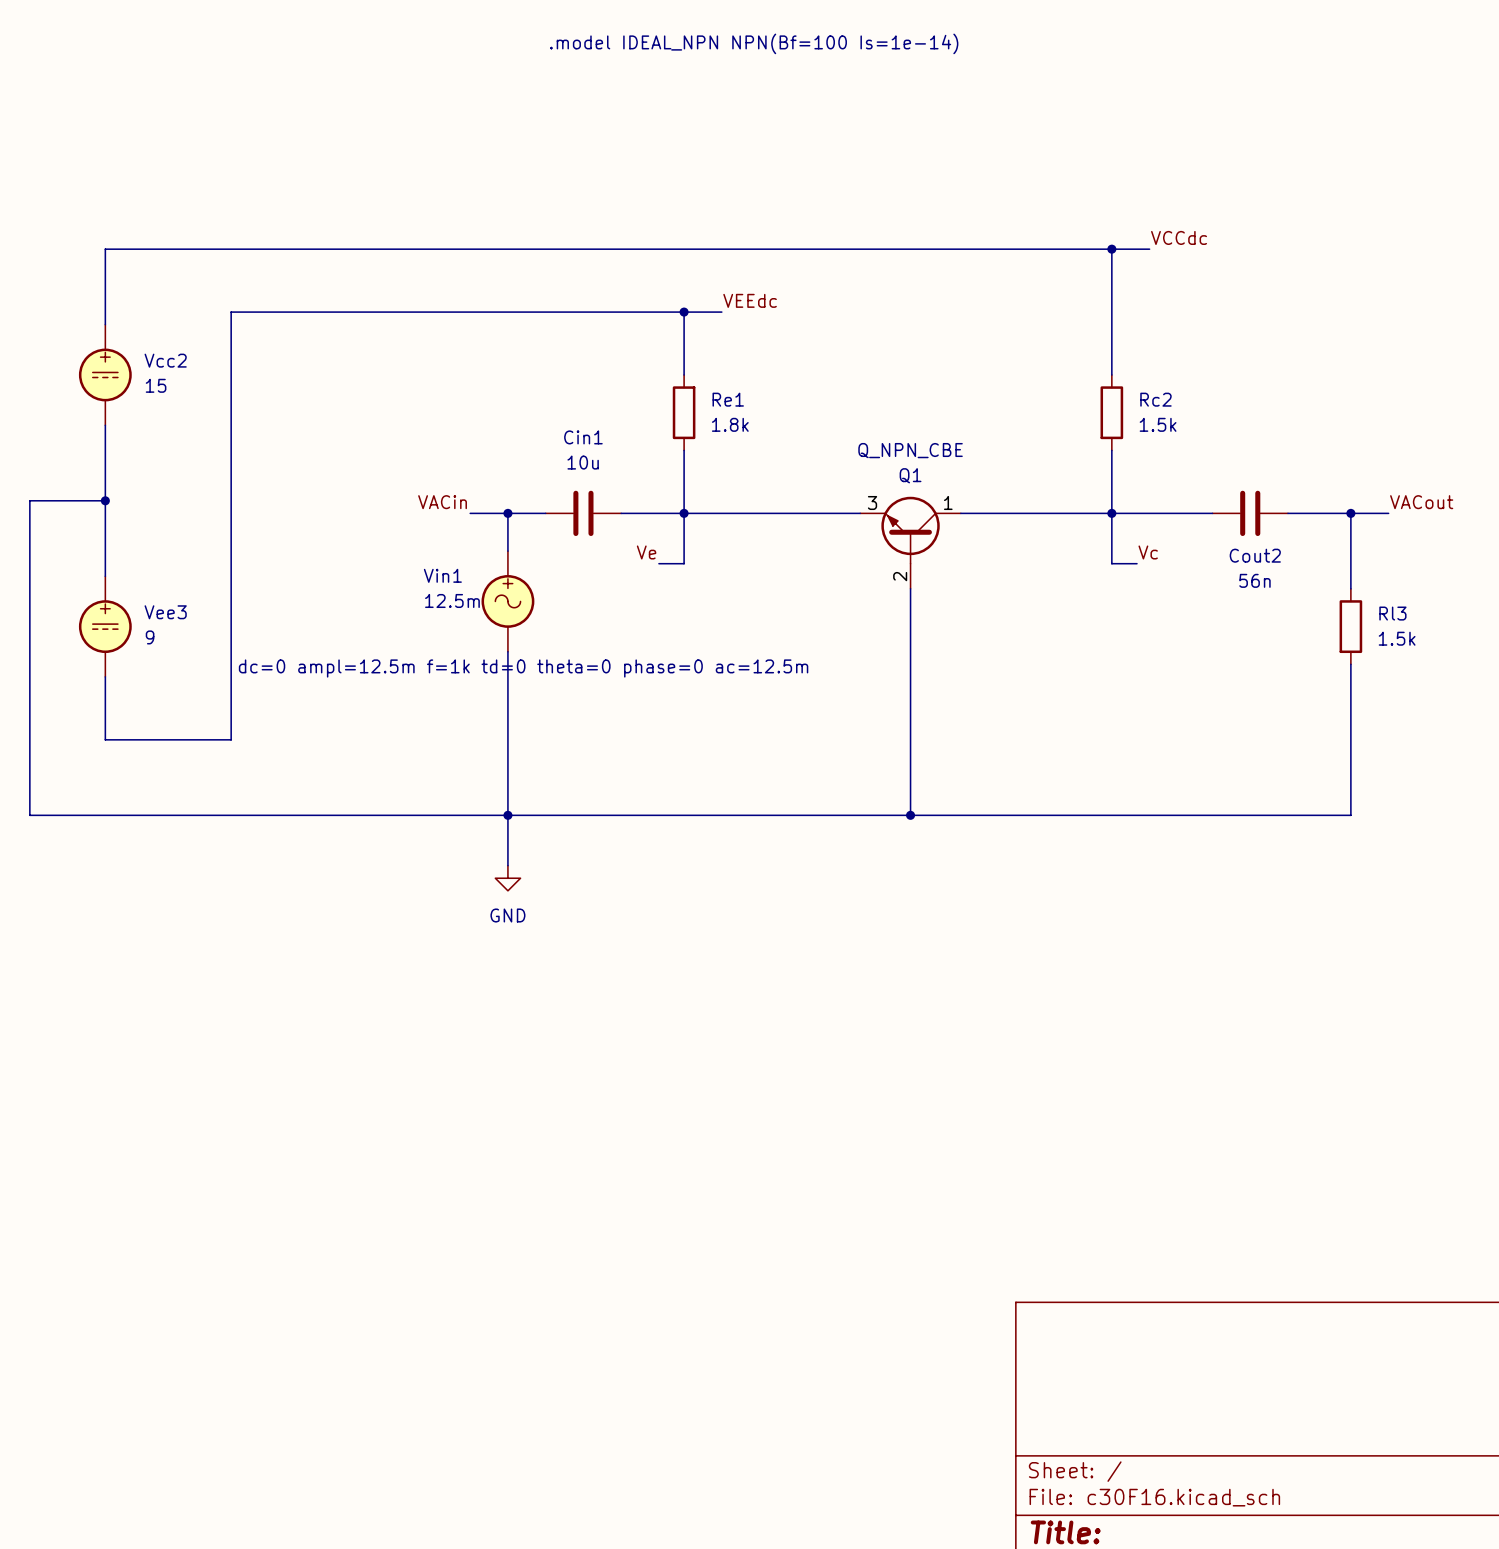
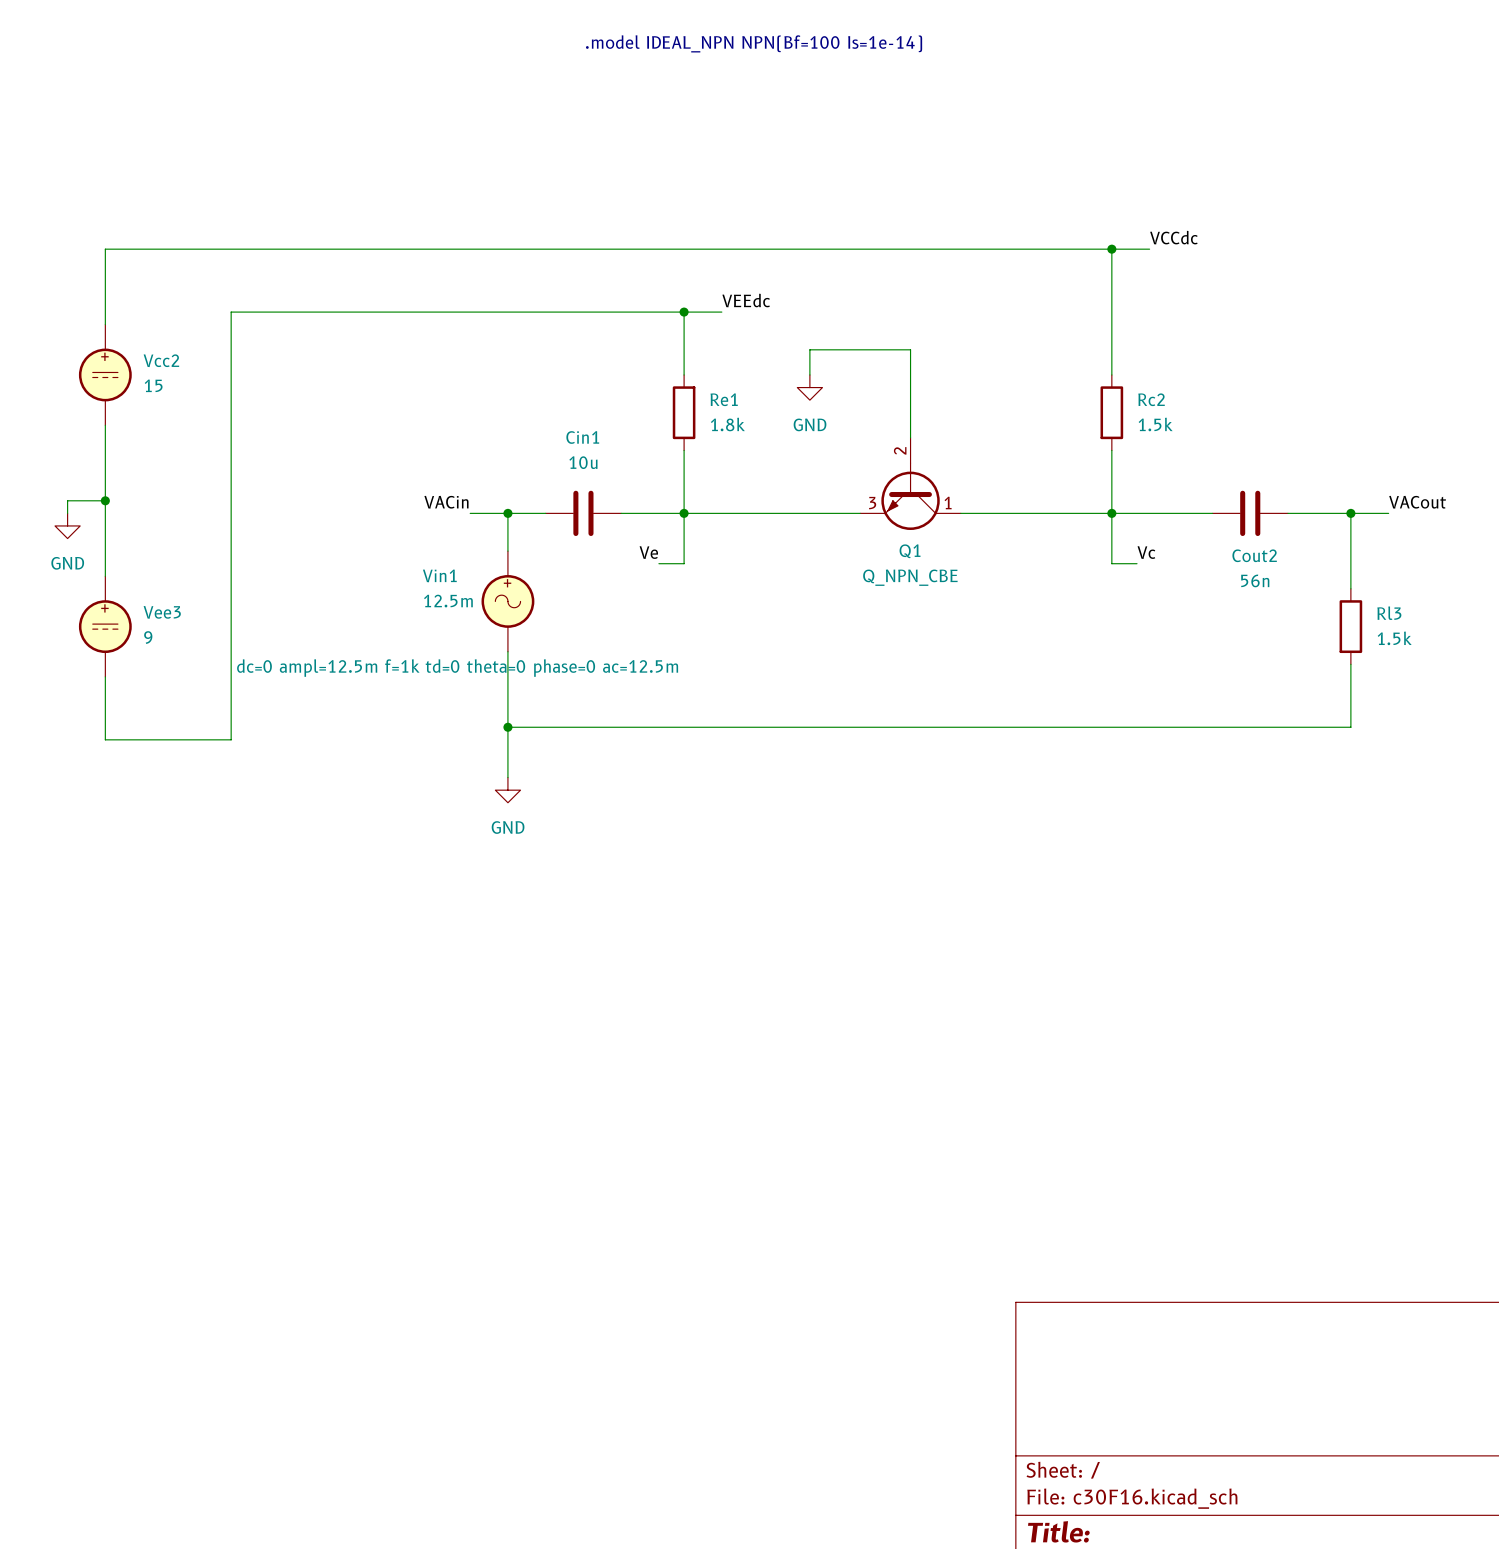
wire: none -> (809, 374) (809, 349) (910, 349) (910, 437)
power symbol: none -> GND (809, 387)
wire: (67, 500) (29, 500) (29, 815) (1350, 815) (1350, 727) -> (507, 727) (1350, 727)
wire: none -> (67, 500) (67, 513)
power symbol: none -> GND (67, 525)
Q1 flip: as is (910, 530) -> up-down (910, 496)
wire: (910, 588) (910, 815) -> none
junction: none -> (507, 727)
wire: (507, 777) (507, 865) -> none
junction: (507, 815) -> none
junction: (910, 815) -> none
power symbol position: GND (507, 878) -> GND (507, 790)

